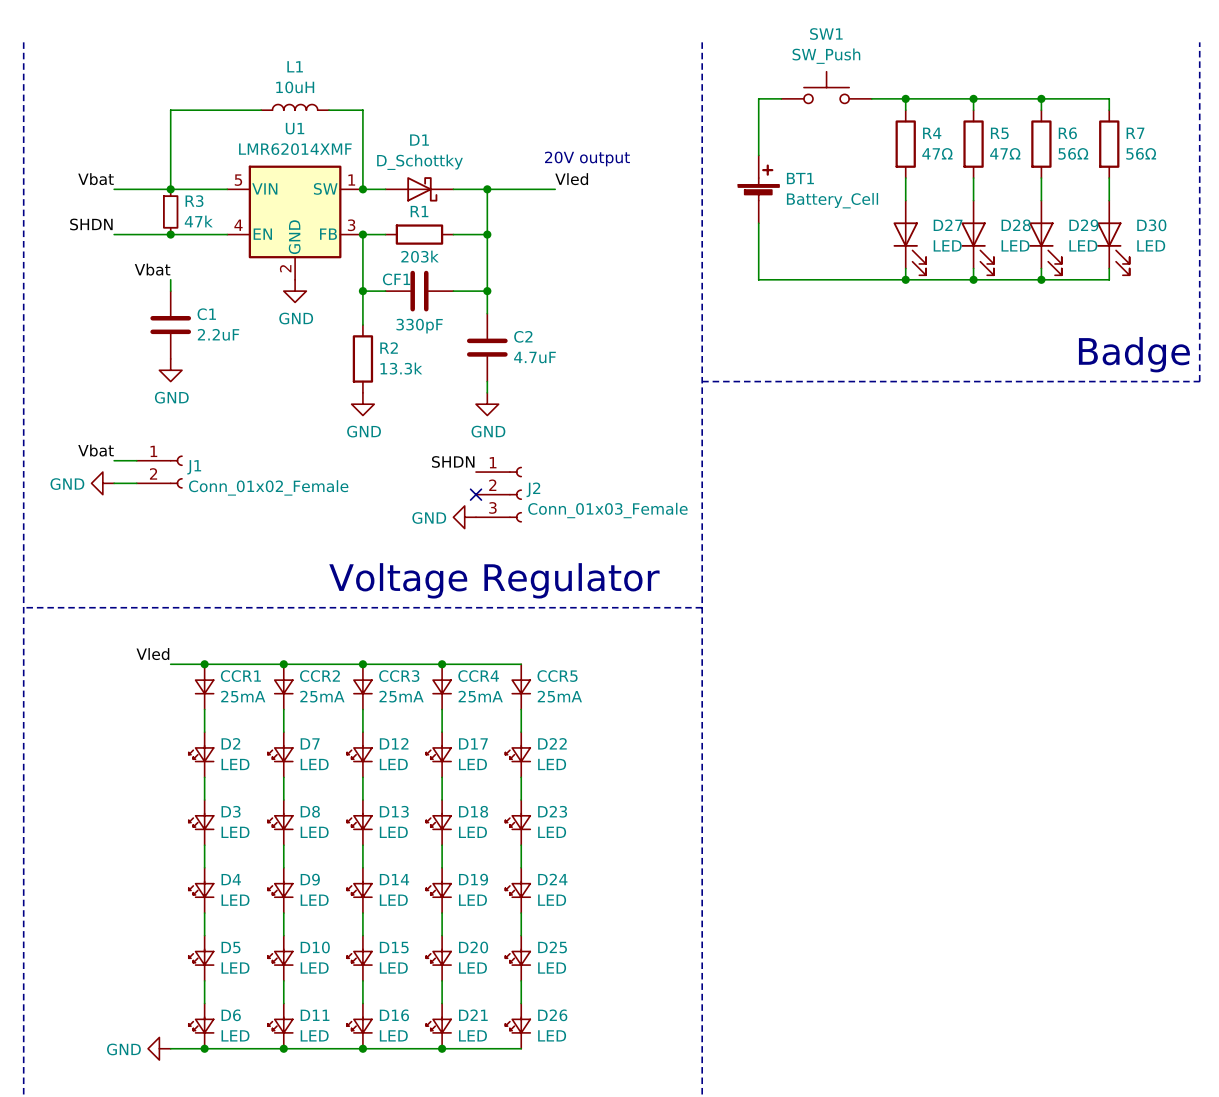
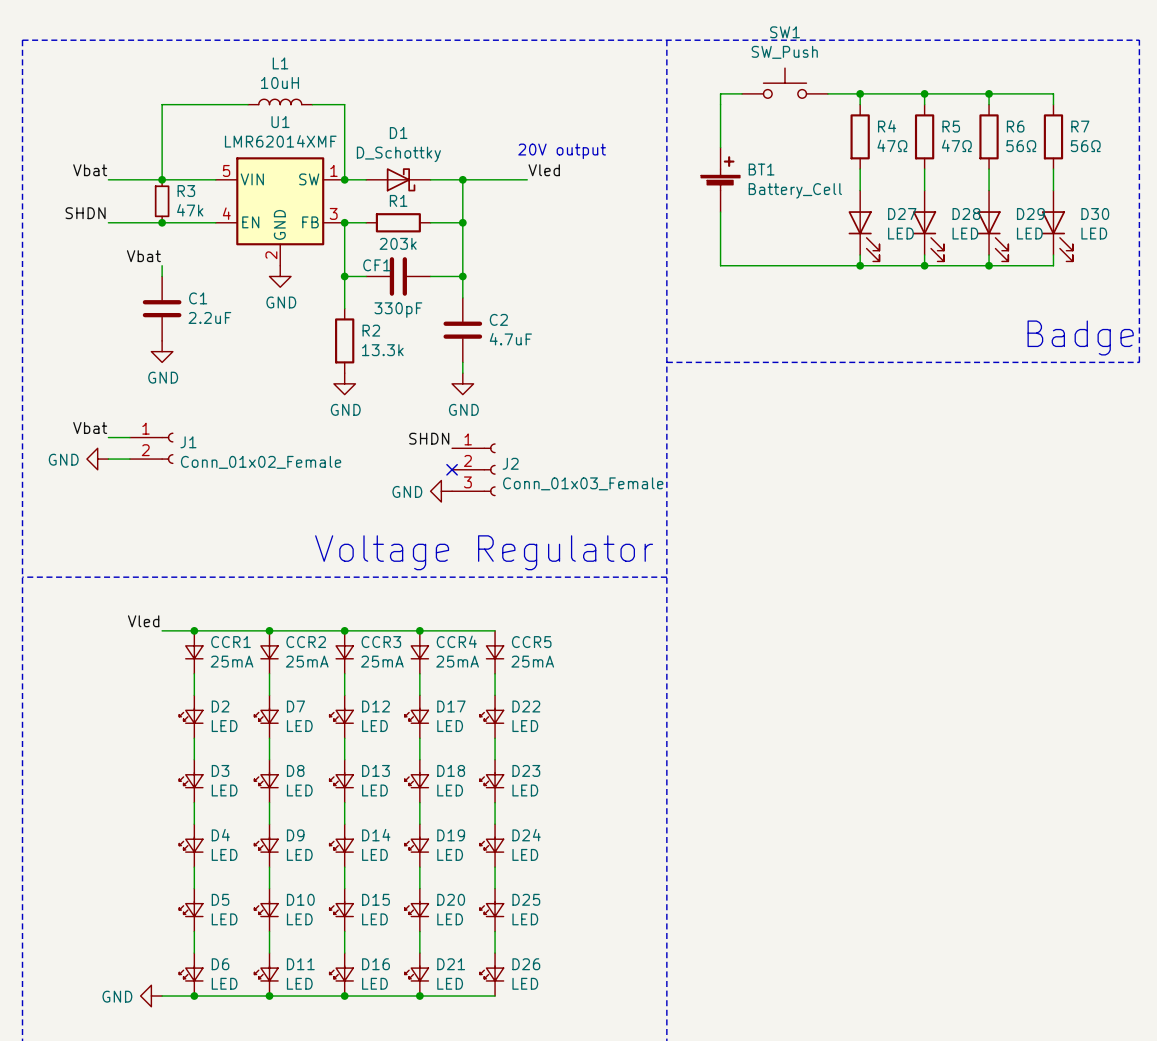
line: none -> (22, 40) (1139, 40)

